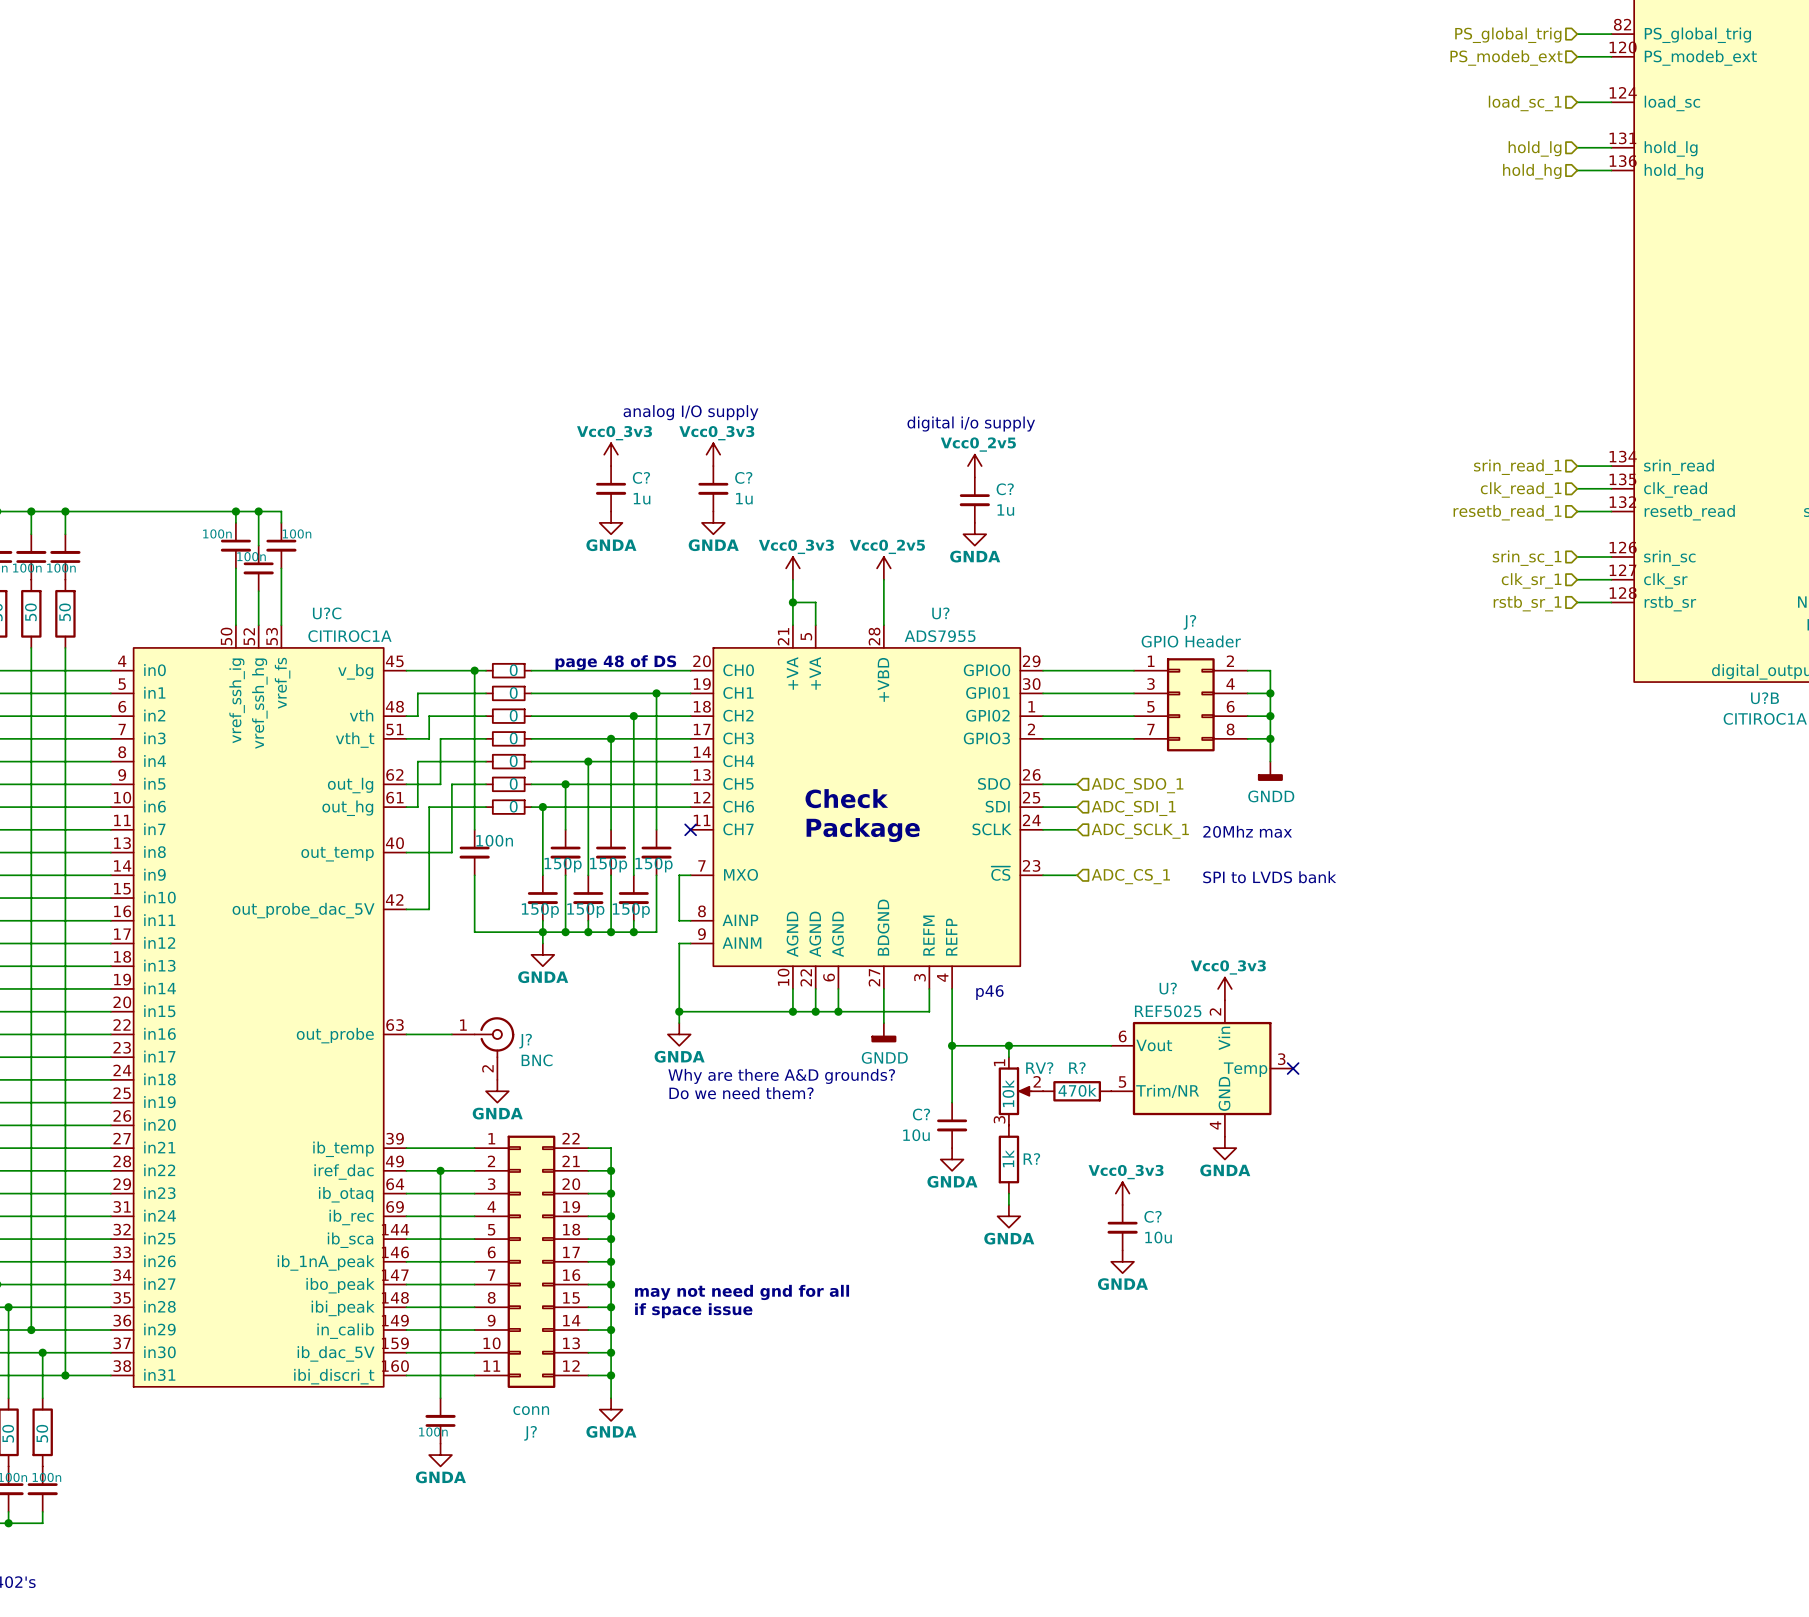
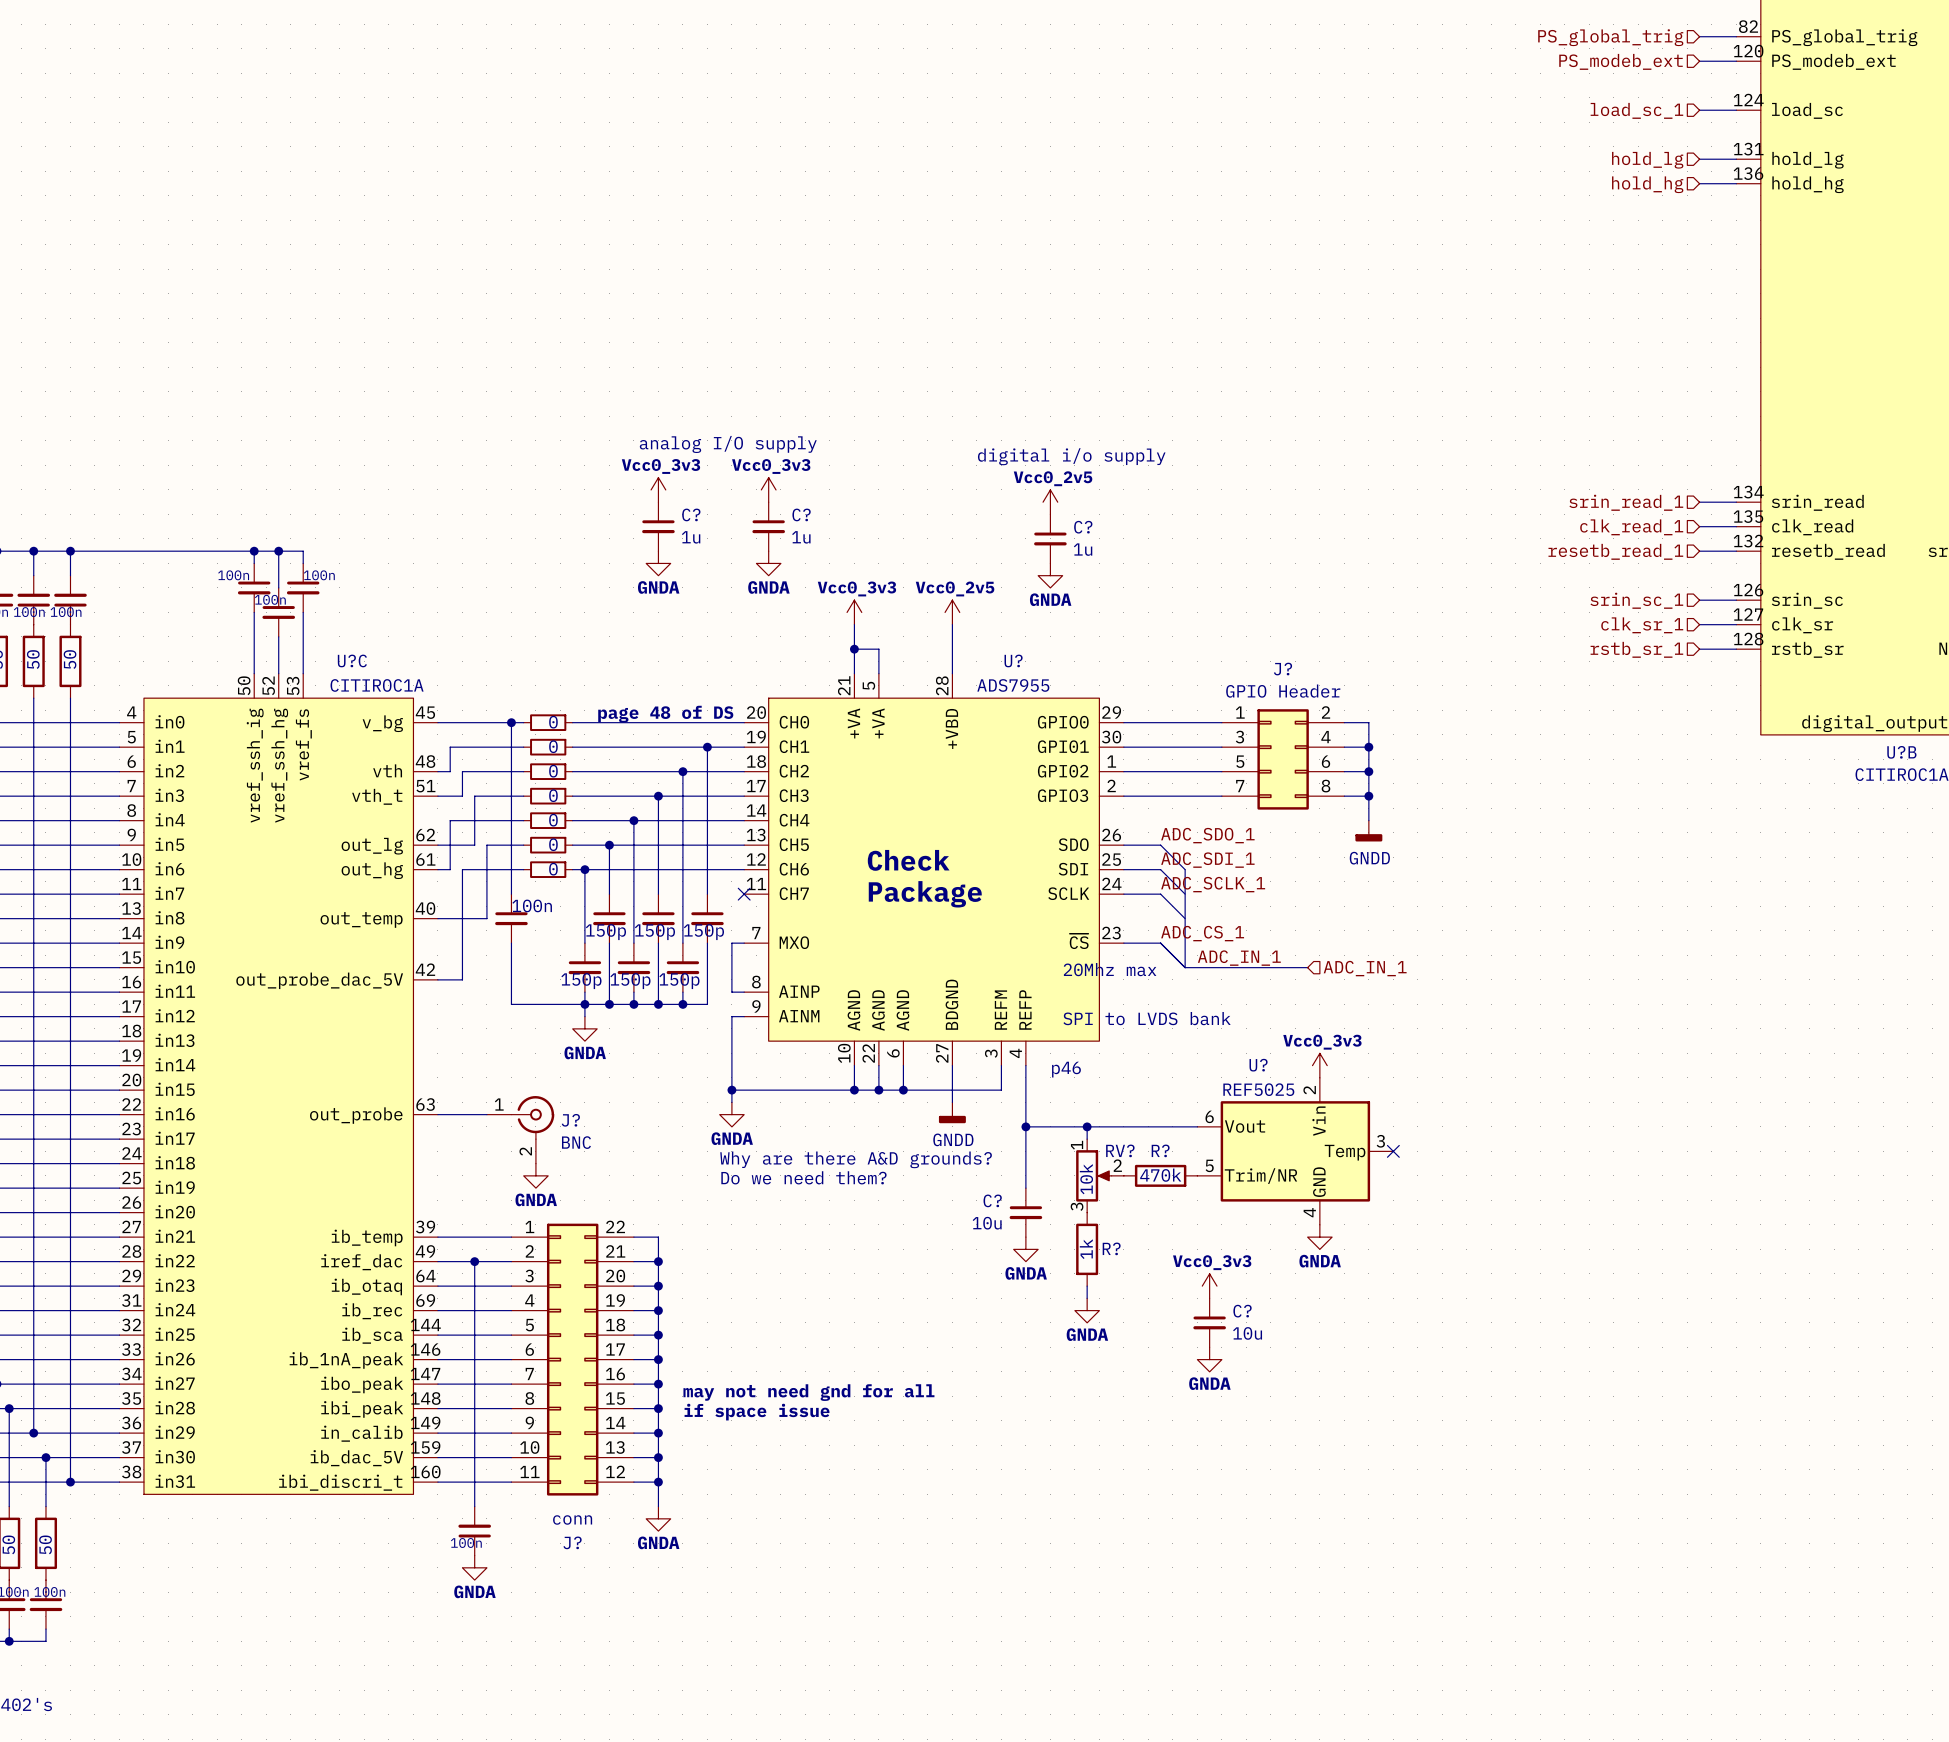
label: none -> ADC_SDO_1 (1207, 835)
wire: none -> (1160, 845) (1185, 869)
hierarchical label: ADC_SDO_1 (1137, 785) -> none
label: none -> ADC_SDI_1 (1207, 860)
wire: none -> (1160, 869) (1185, 894)
bus: none -> (1185, 869) (1185, 967) (1307, 967)
hierarchical label: ADC_SDI_1 (1133, 808) -> none
label: none -> ADC_SCLK_1 (1213, 884)
wire: none -> (1160, 894) (1185, 918)
hierarchical label: ADC_SCLK_1 (1140, 831) -> none
text: 20Mhz max (1247, 831) -> none
label: none -> ADC_CS_1 (1202, 933)
wire: none -> (1160, 943) (1185, 967)
hierarchical label: ADC_CS_1 (1130, 876) -> none
text: SPI to LVDS bank (1269, 877) -> none
label: none -> ADC_IN_1 (1239, 958)
text: none -> 20Mhz max (1110, 969)
hierarchical label: none -> ADC_IN_1 (1365, 968)
text: none -> SPI to LVDS bank (1147, 1018)

